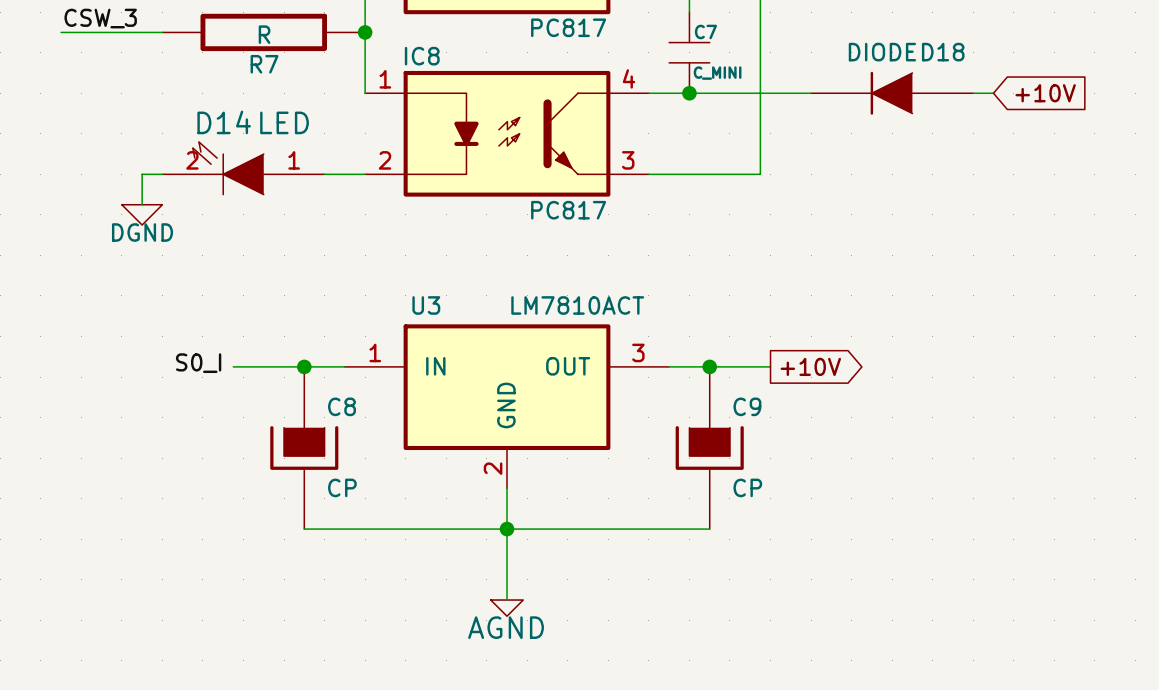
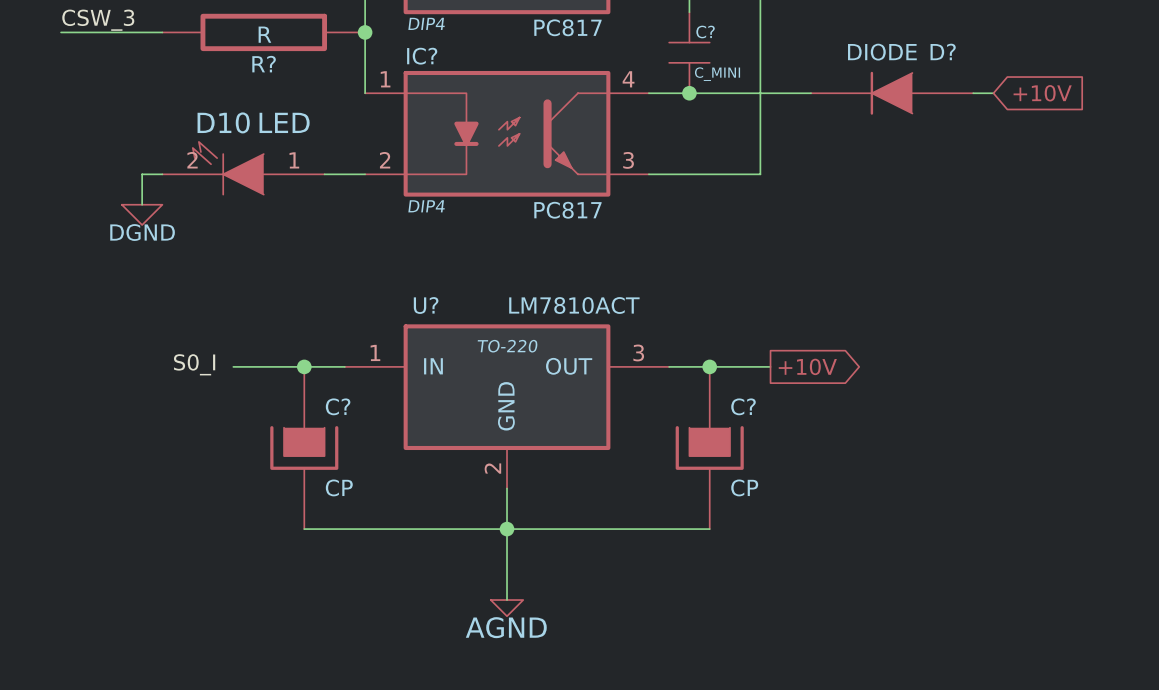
part text: none -> DIP4 (426, 23)
C7 name: C7 (705, 31) -> C? (705, 31)
D18 name: D18 (943, 52) -> D? (943, 51)
IC8 name: IC8 (422, 56) -> IC? (422, 56)
R7 name: R7 (264, 64) -> R? (264, 64)
D14 name: D14 (224, 122) -> D10 (223, 122)
IC8 text: none -> DIP4 (426, 206)
U3 name: U3 (426, 305) -> U? (426, 305)
U3 text: none -> TO-220 (507, 346)
C8 name: C8 (342, 406) -> C? (338, 406)
C9 name: C9 (747, 406) -> C? (743, 406)

